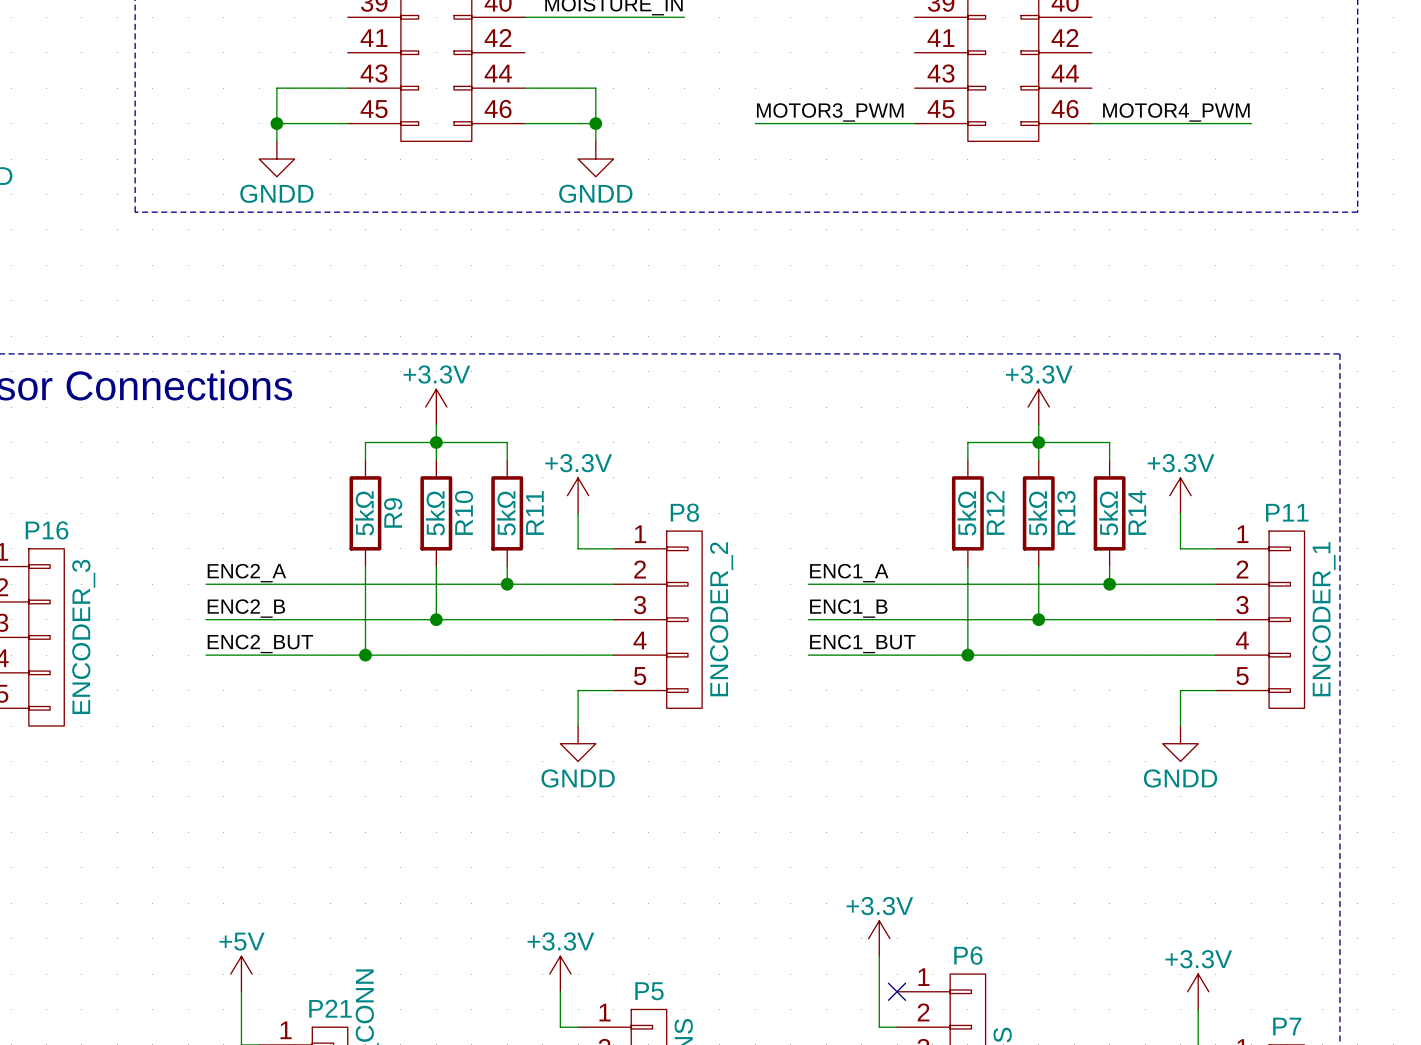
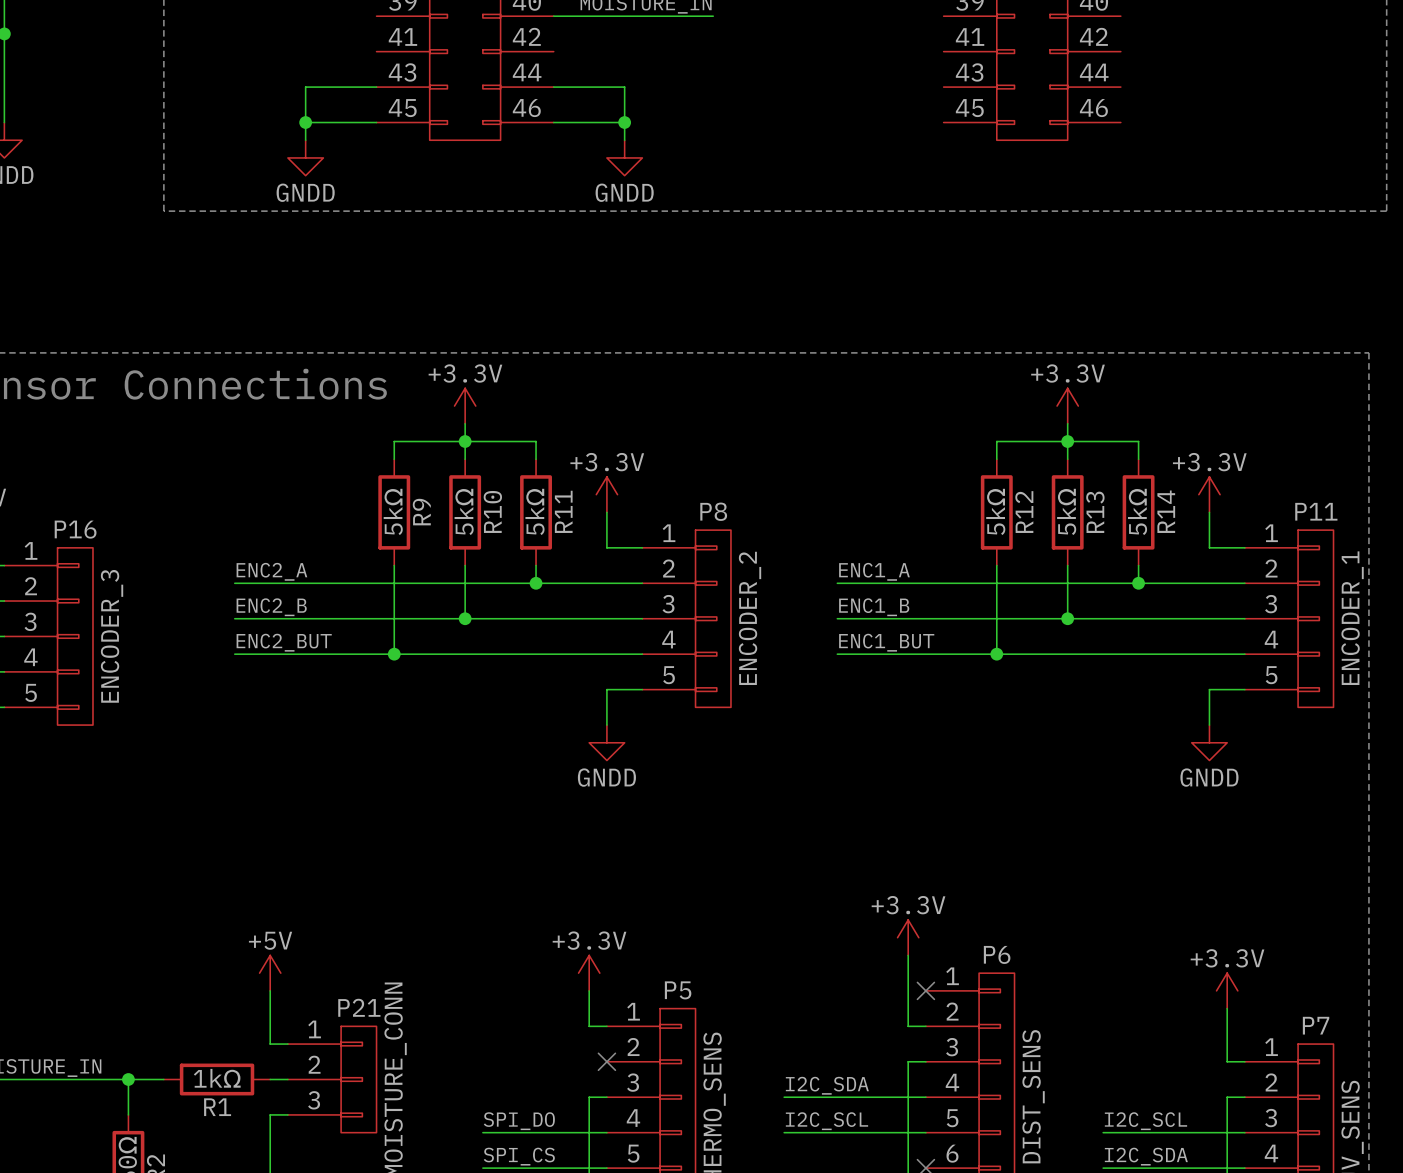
label: MOTOR3_PWM (830, 112) -> none
label: MOTOR4_PWM (1176, 112) -> none
wire: (755, 123) (914, 123) -> none
wire: (1091, 123) (1251, 123) -> none

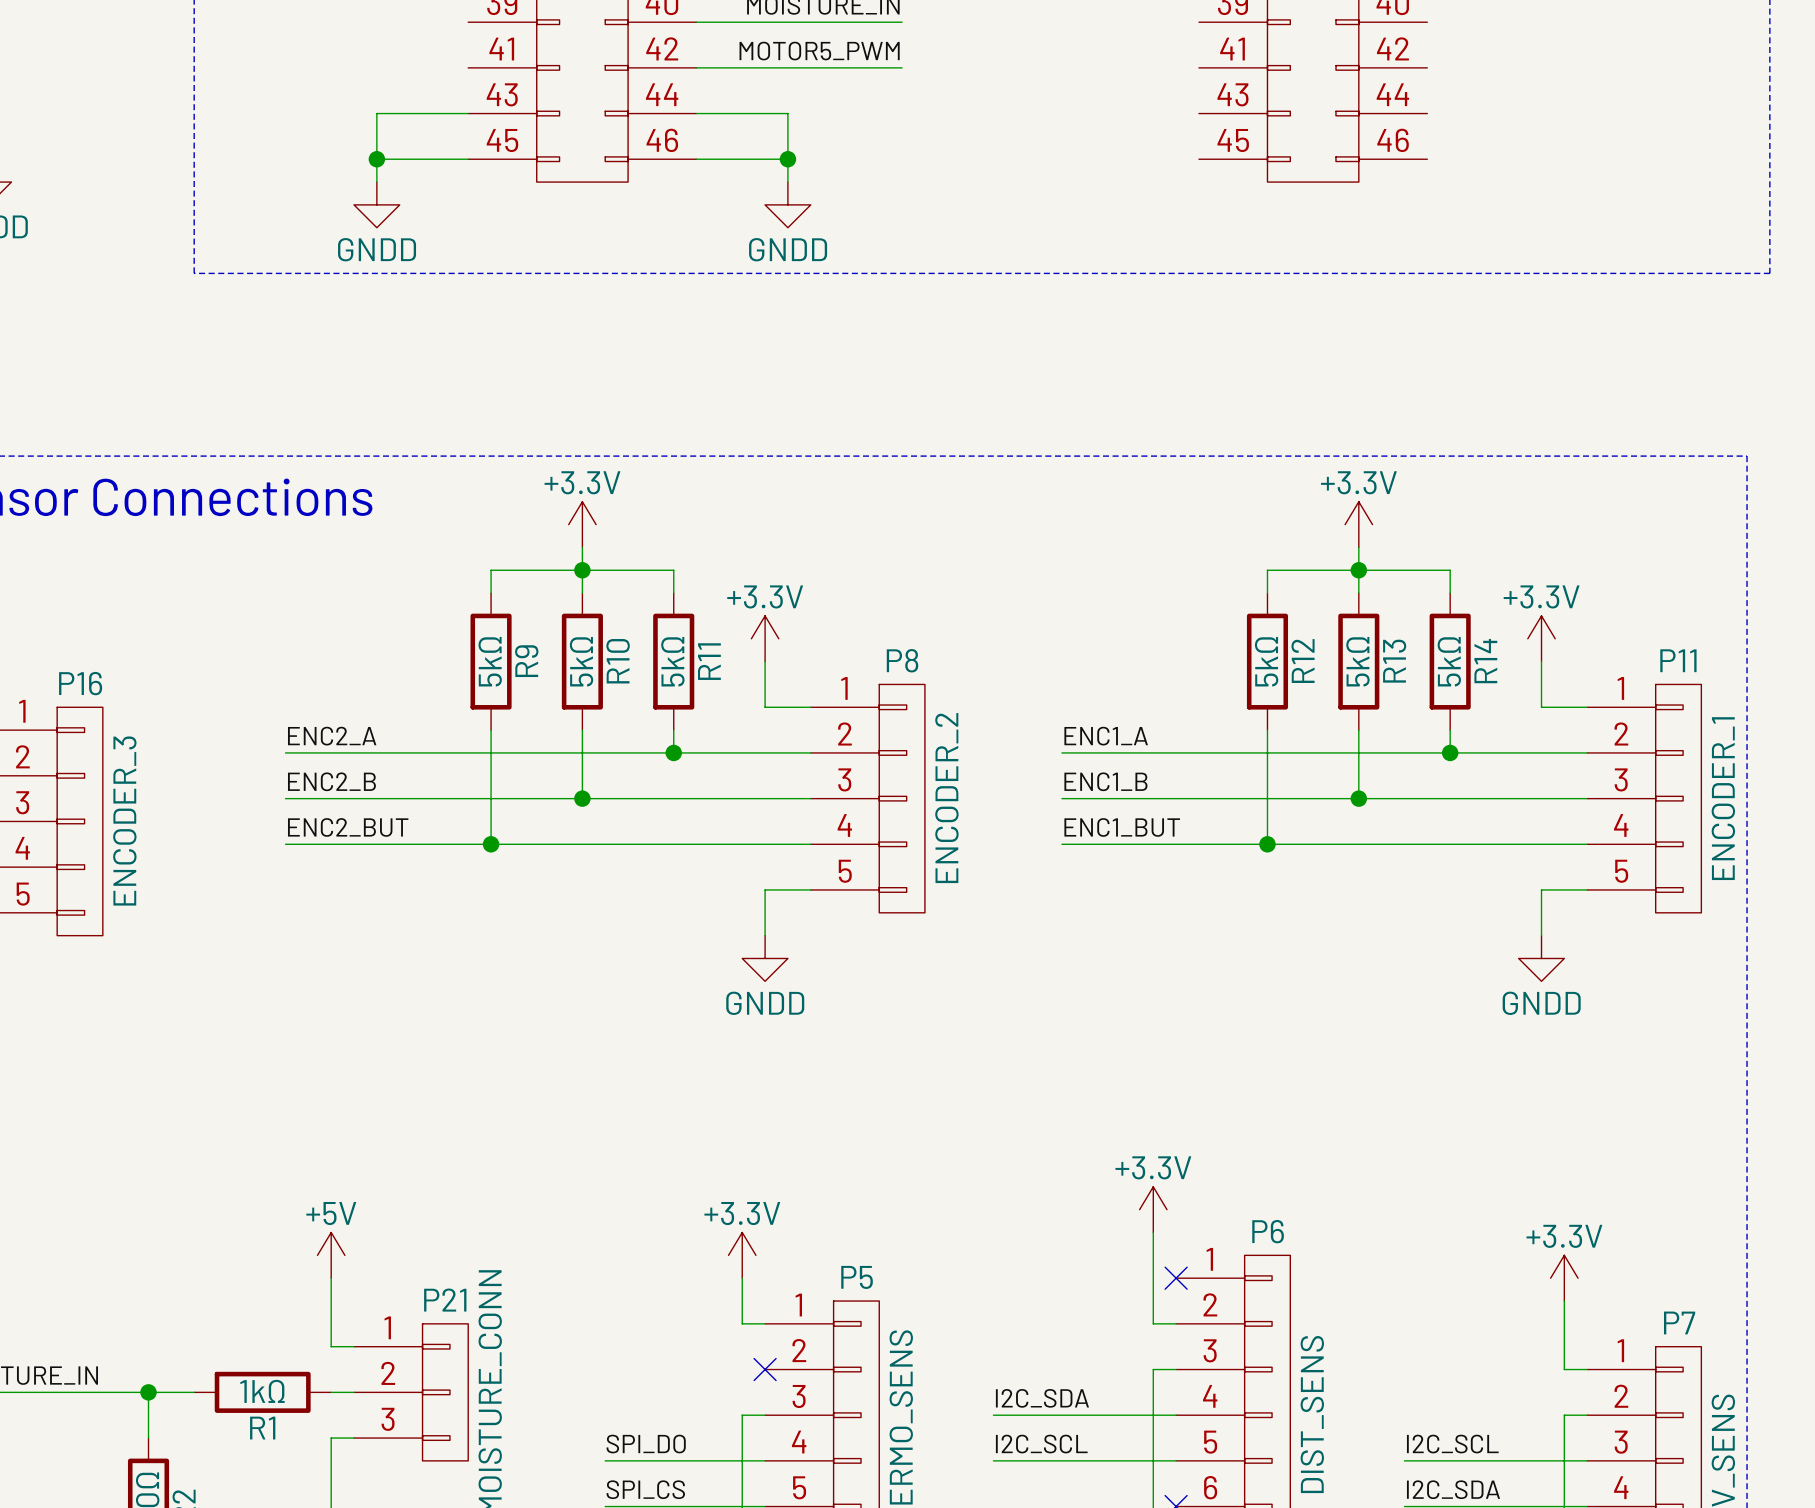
label: none -> MOTOR5_PWM (819, 51)
wire: none -> (696, 67) (902, 67)

